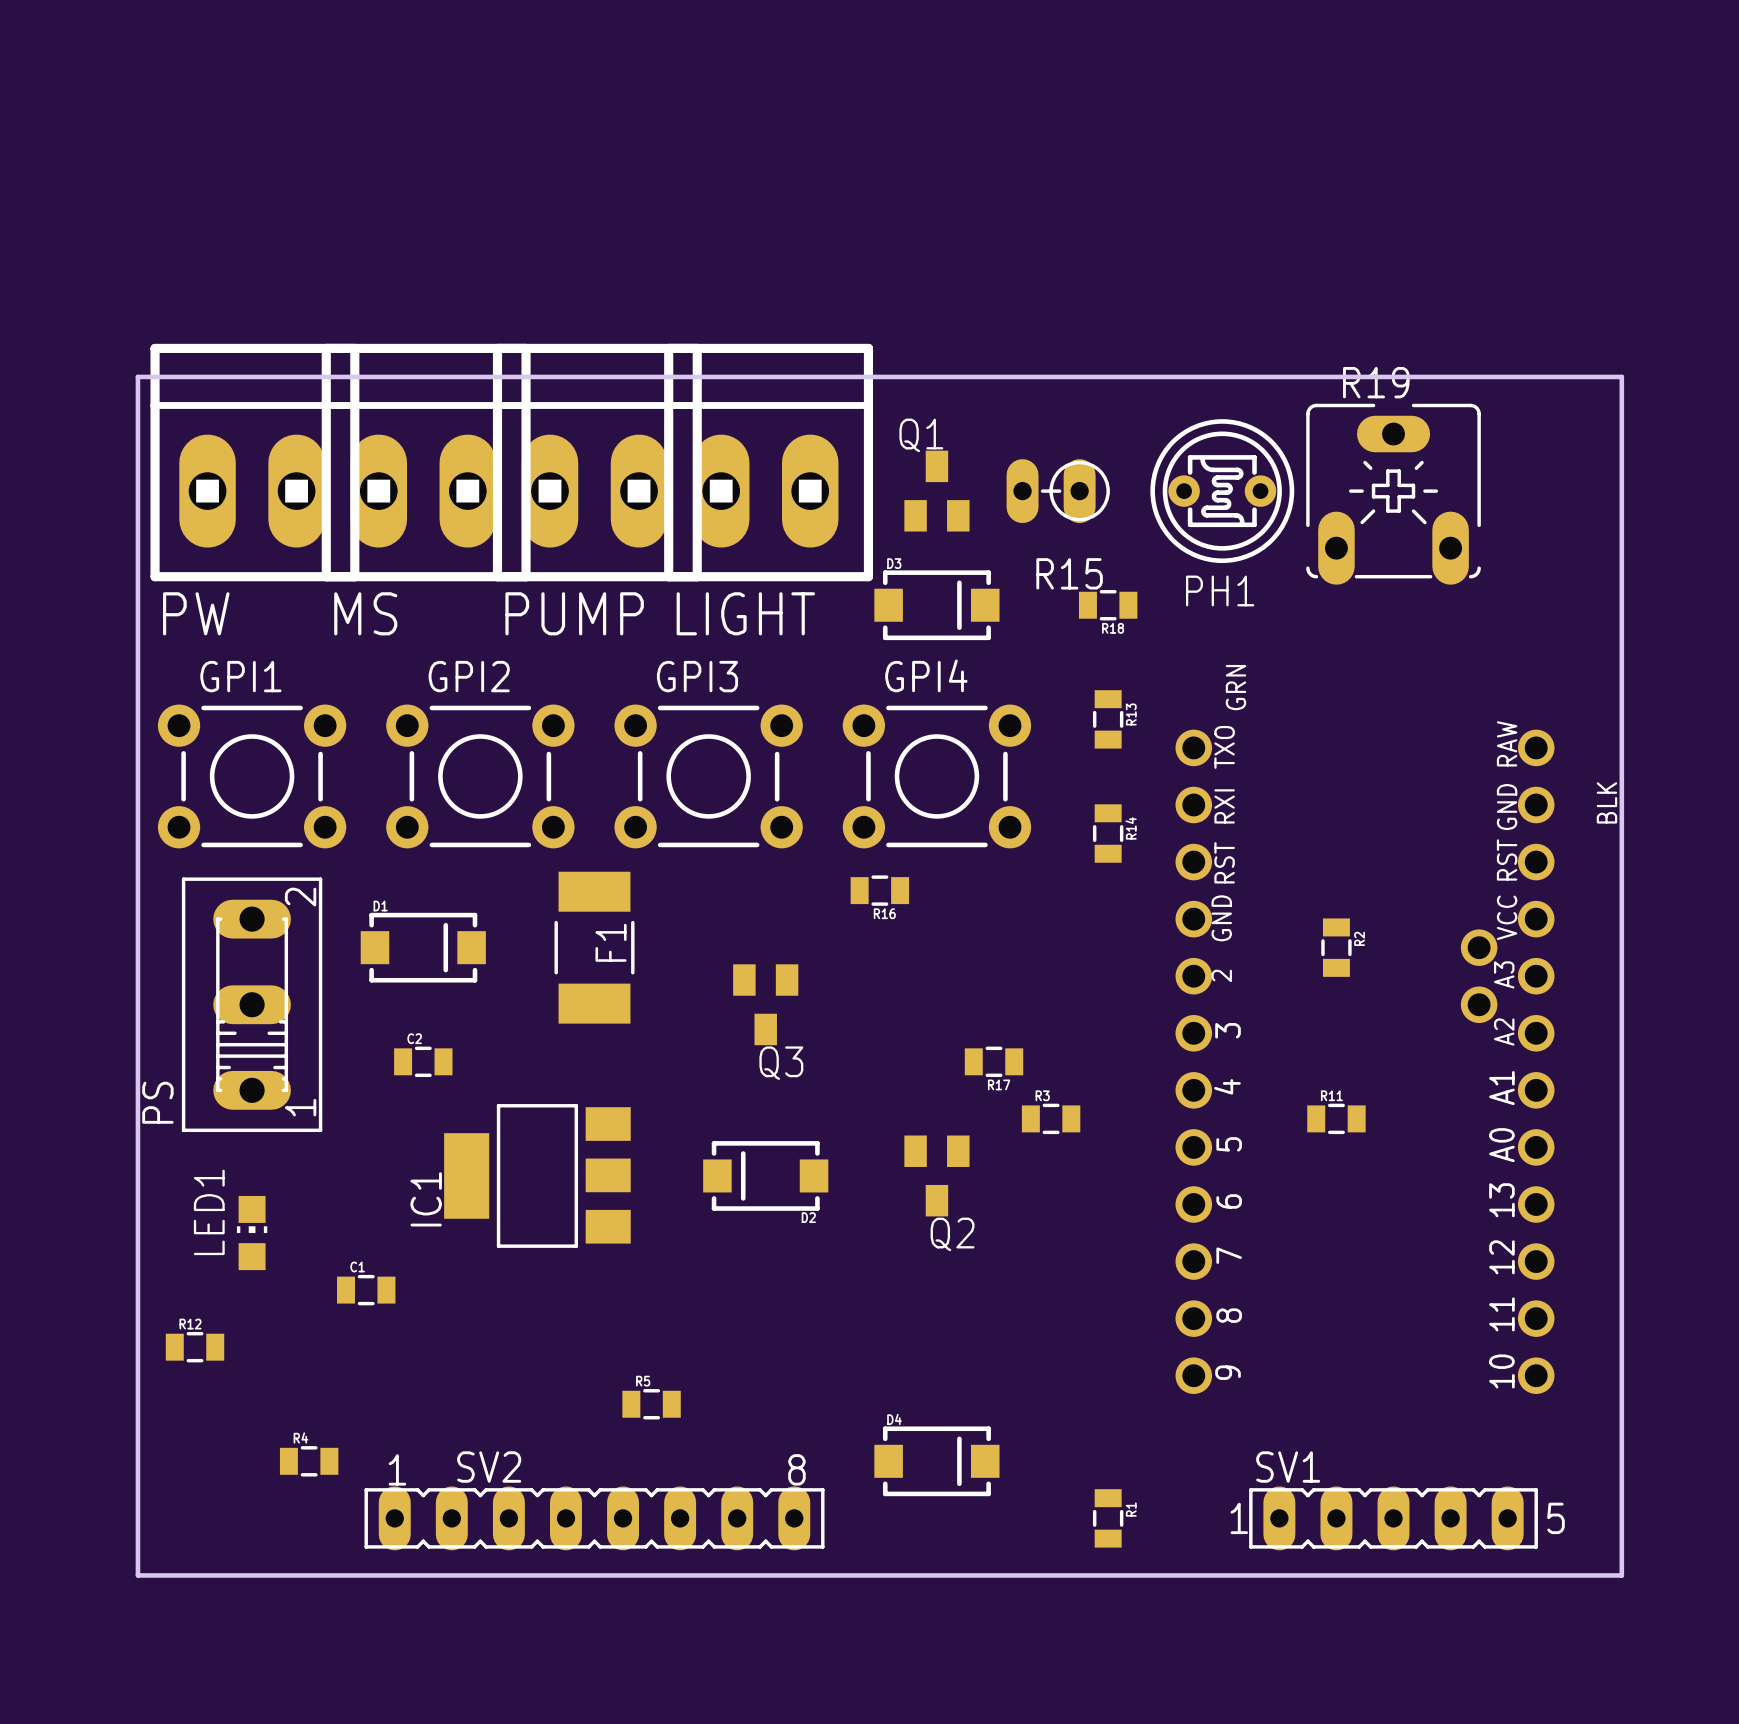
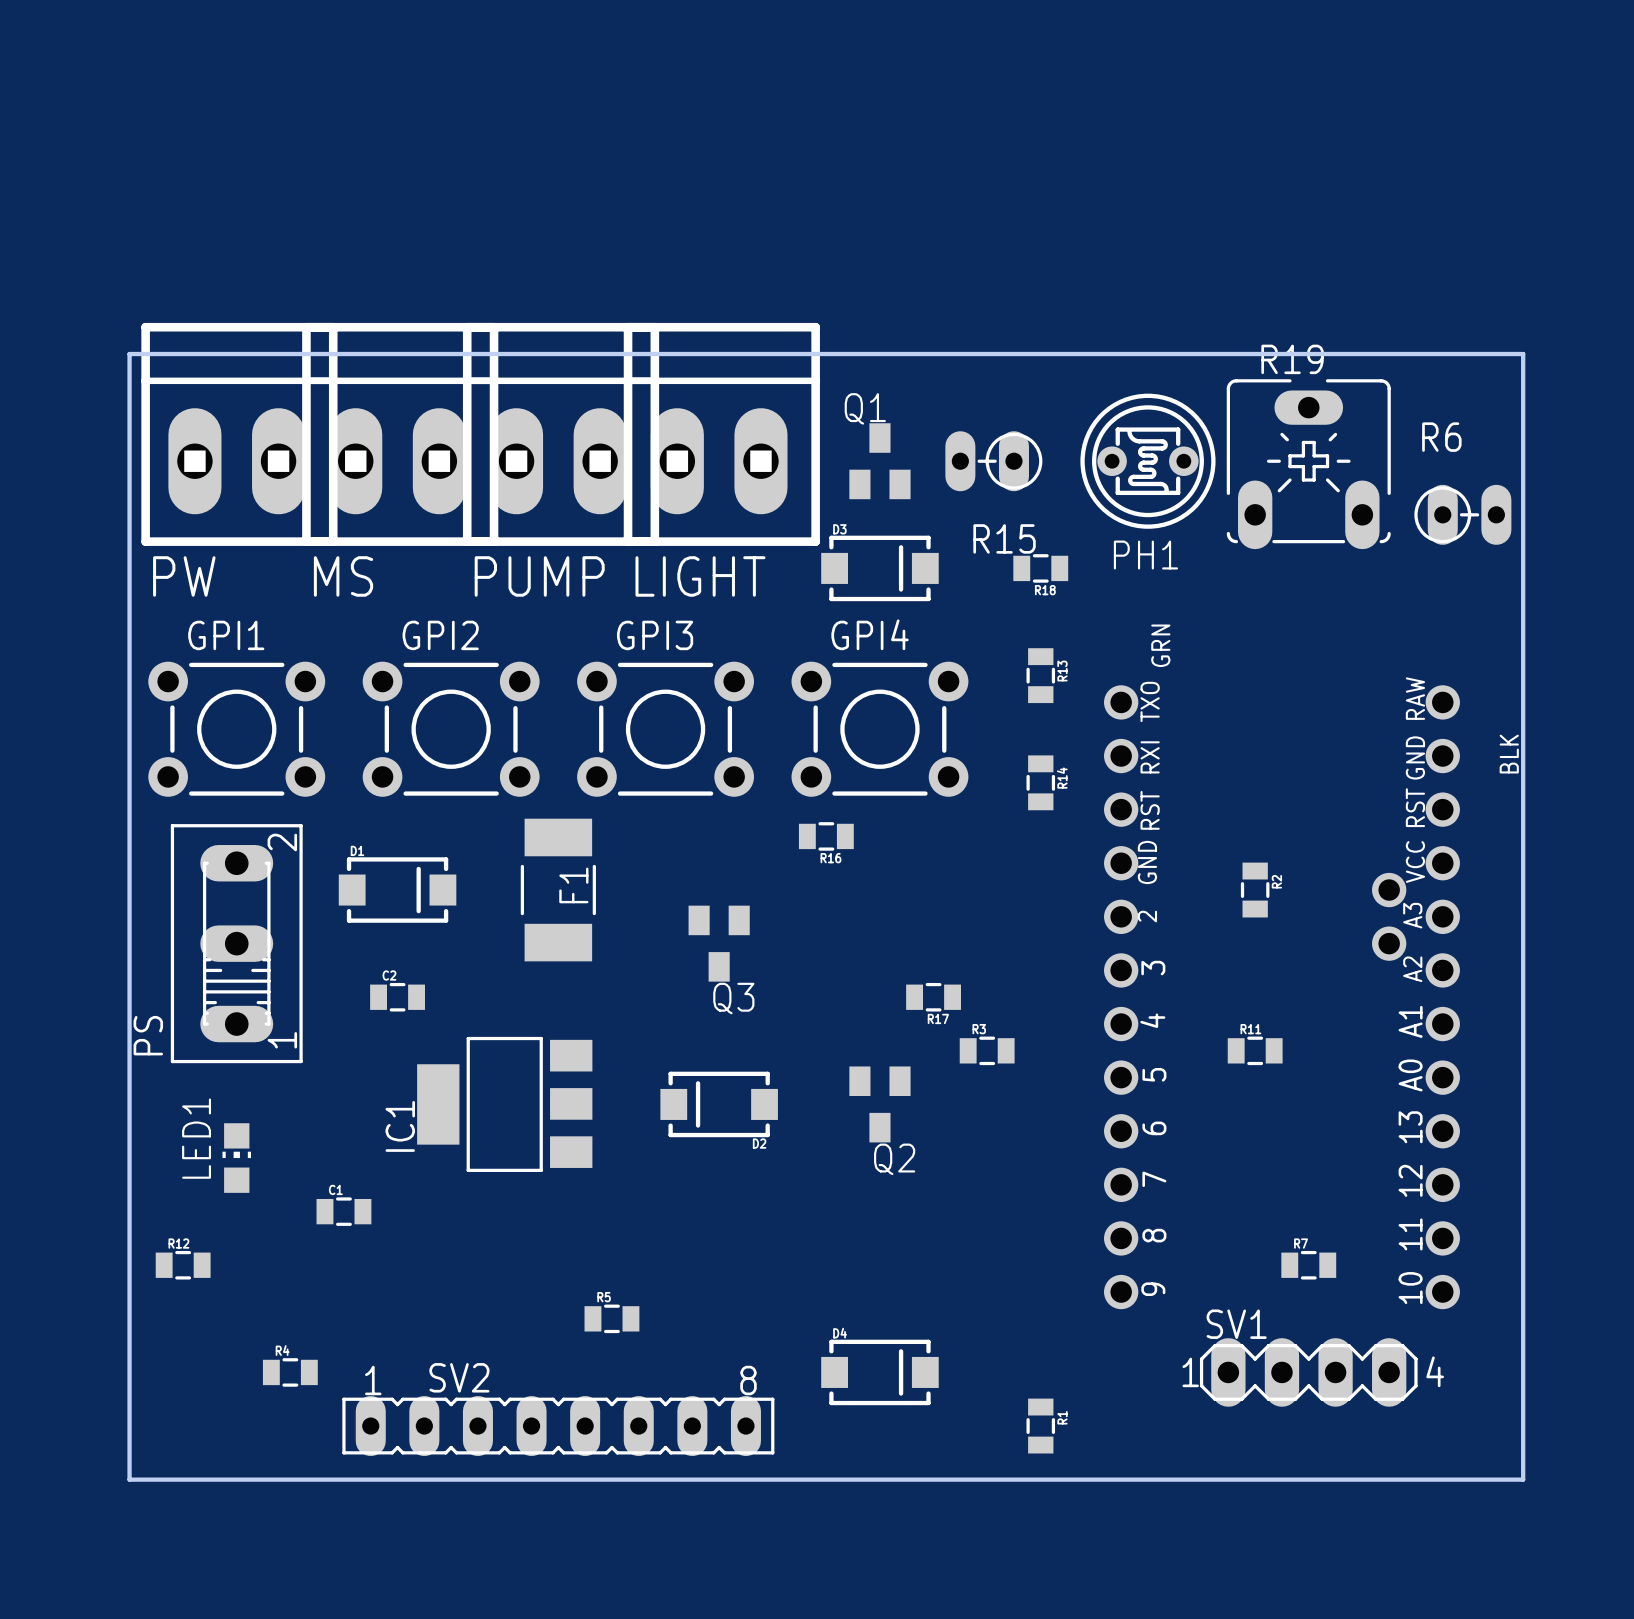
R6: none -> (1462, 514)
R7: none -> (1308, 1265)
SV1 footprint: [1249, 1486, 1538, 1551] -> [1199, 1338, 1418, 1407]

